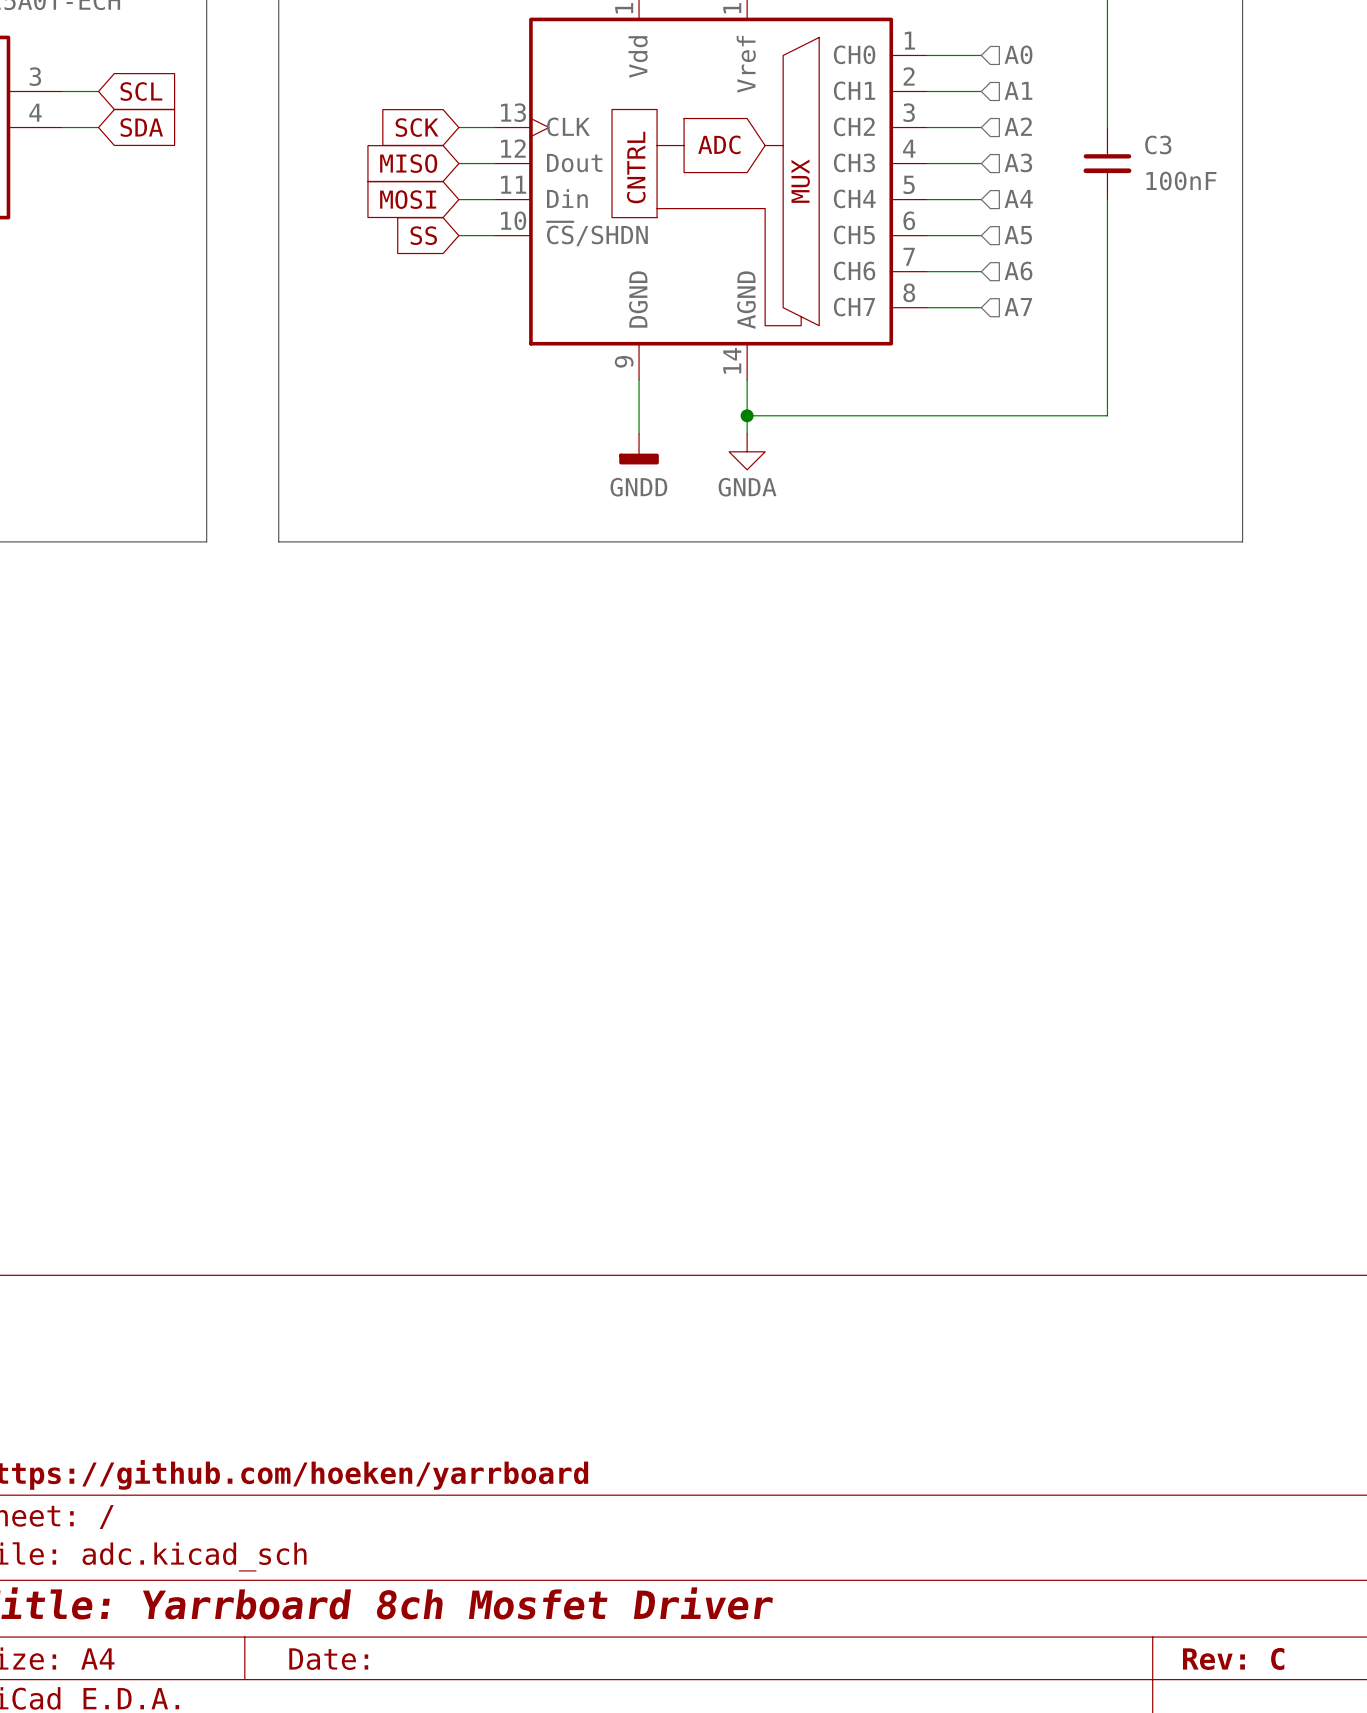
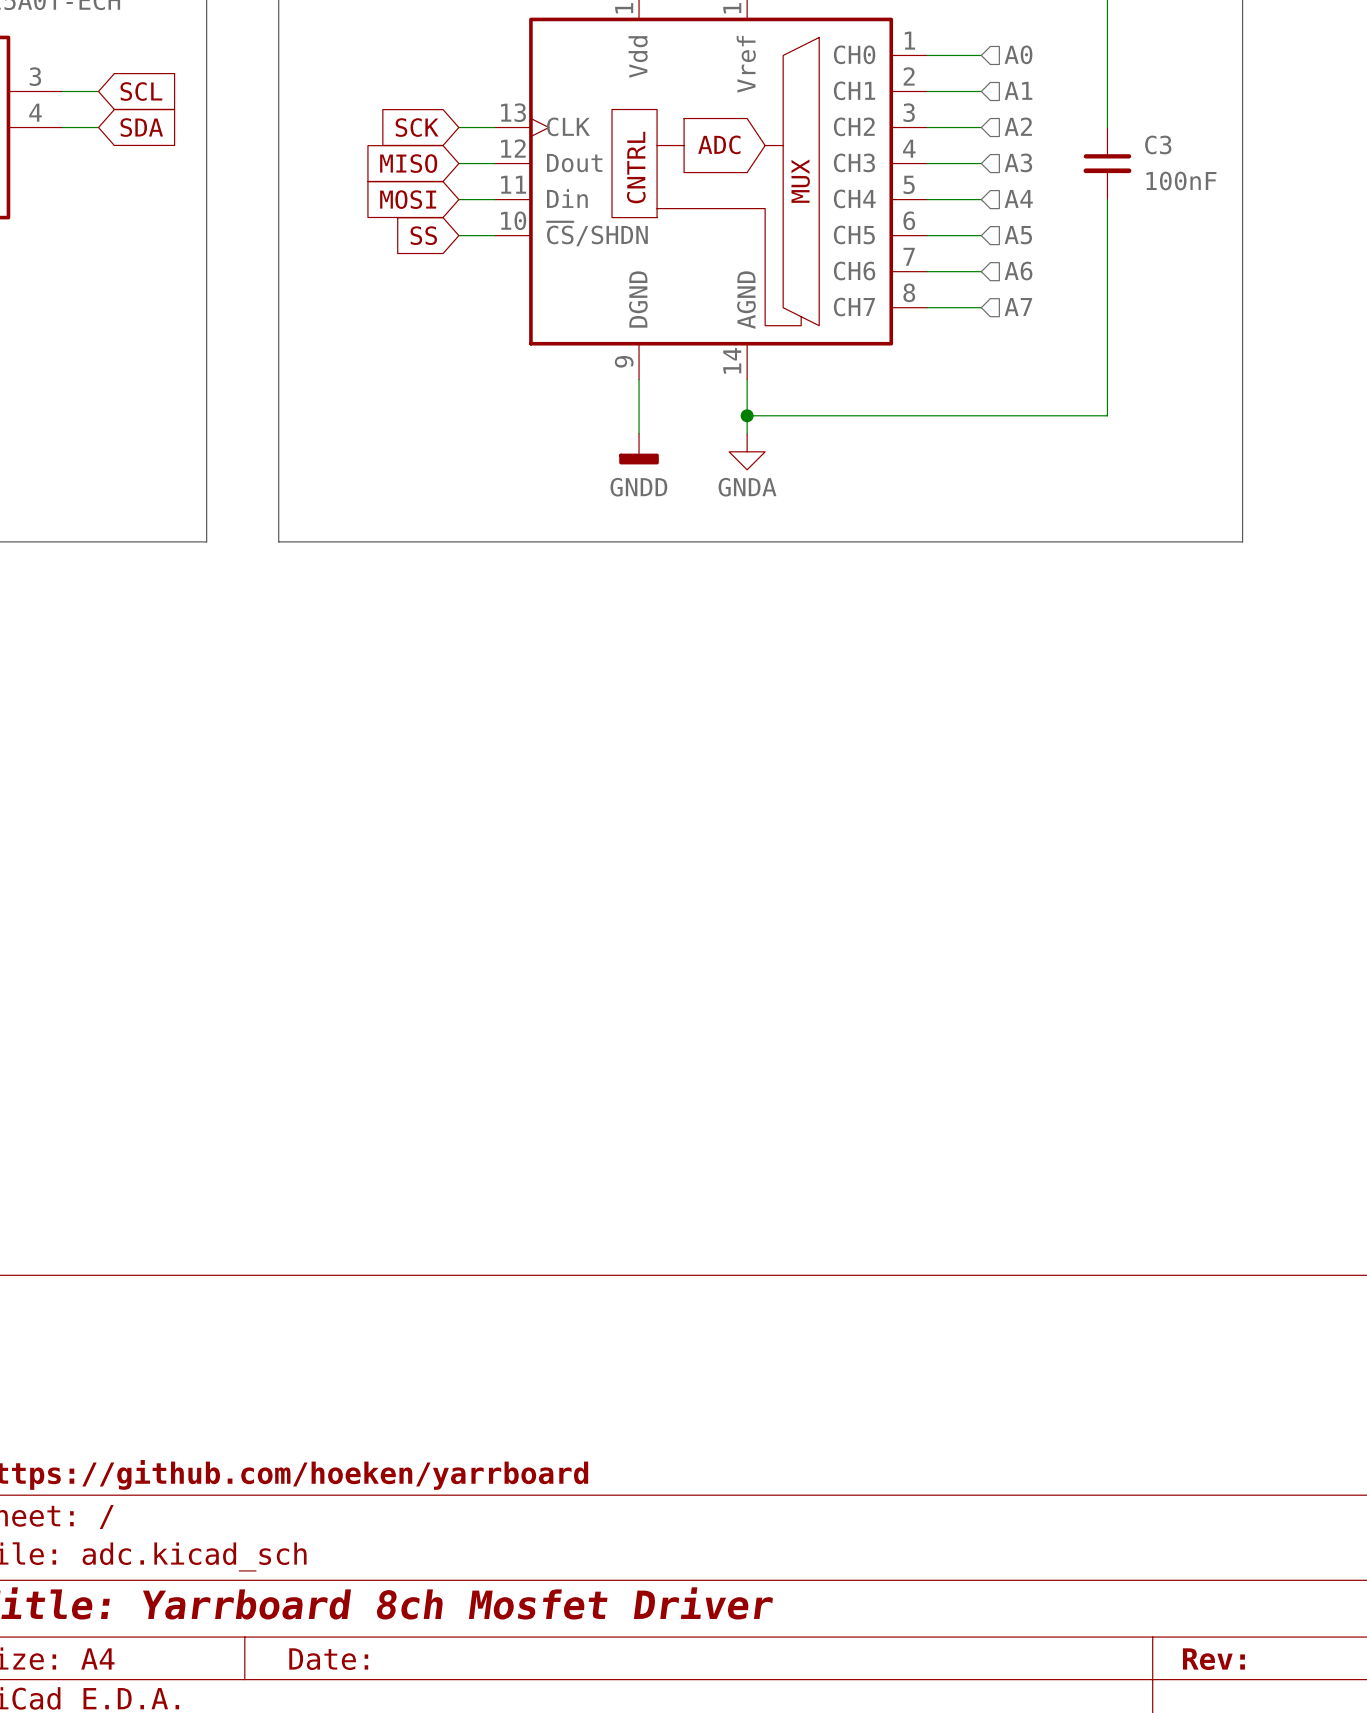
title block: Rev: C (1233, 1658) -> Rev: (1213, 1659)

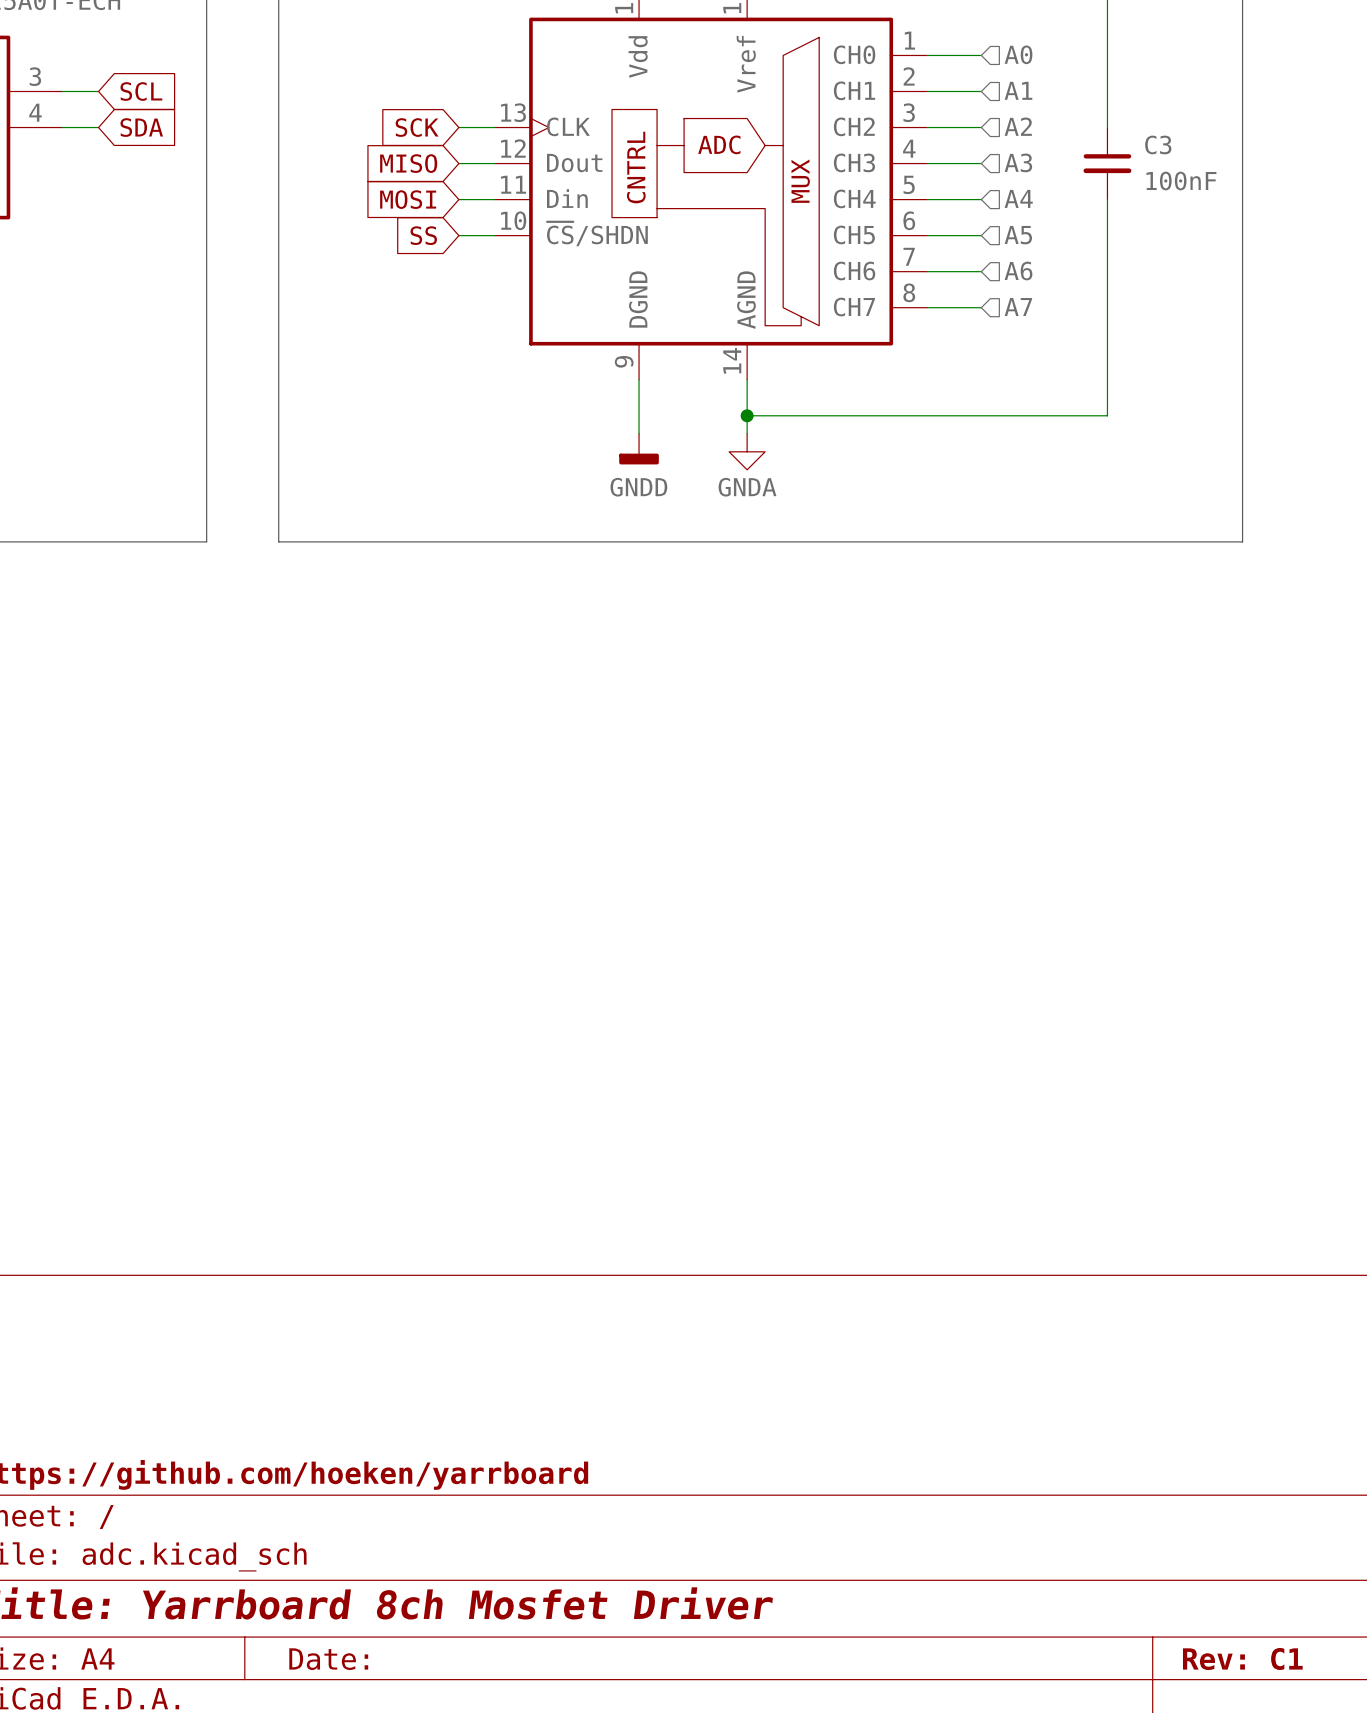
title block: Rev: (1213, 1659) -> Rev: C1 (1242, 1658)

